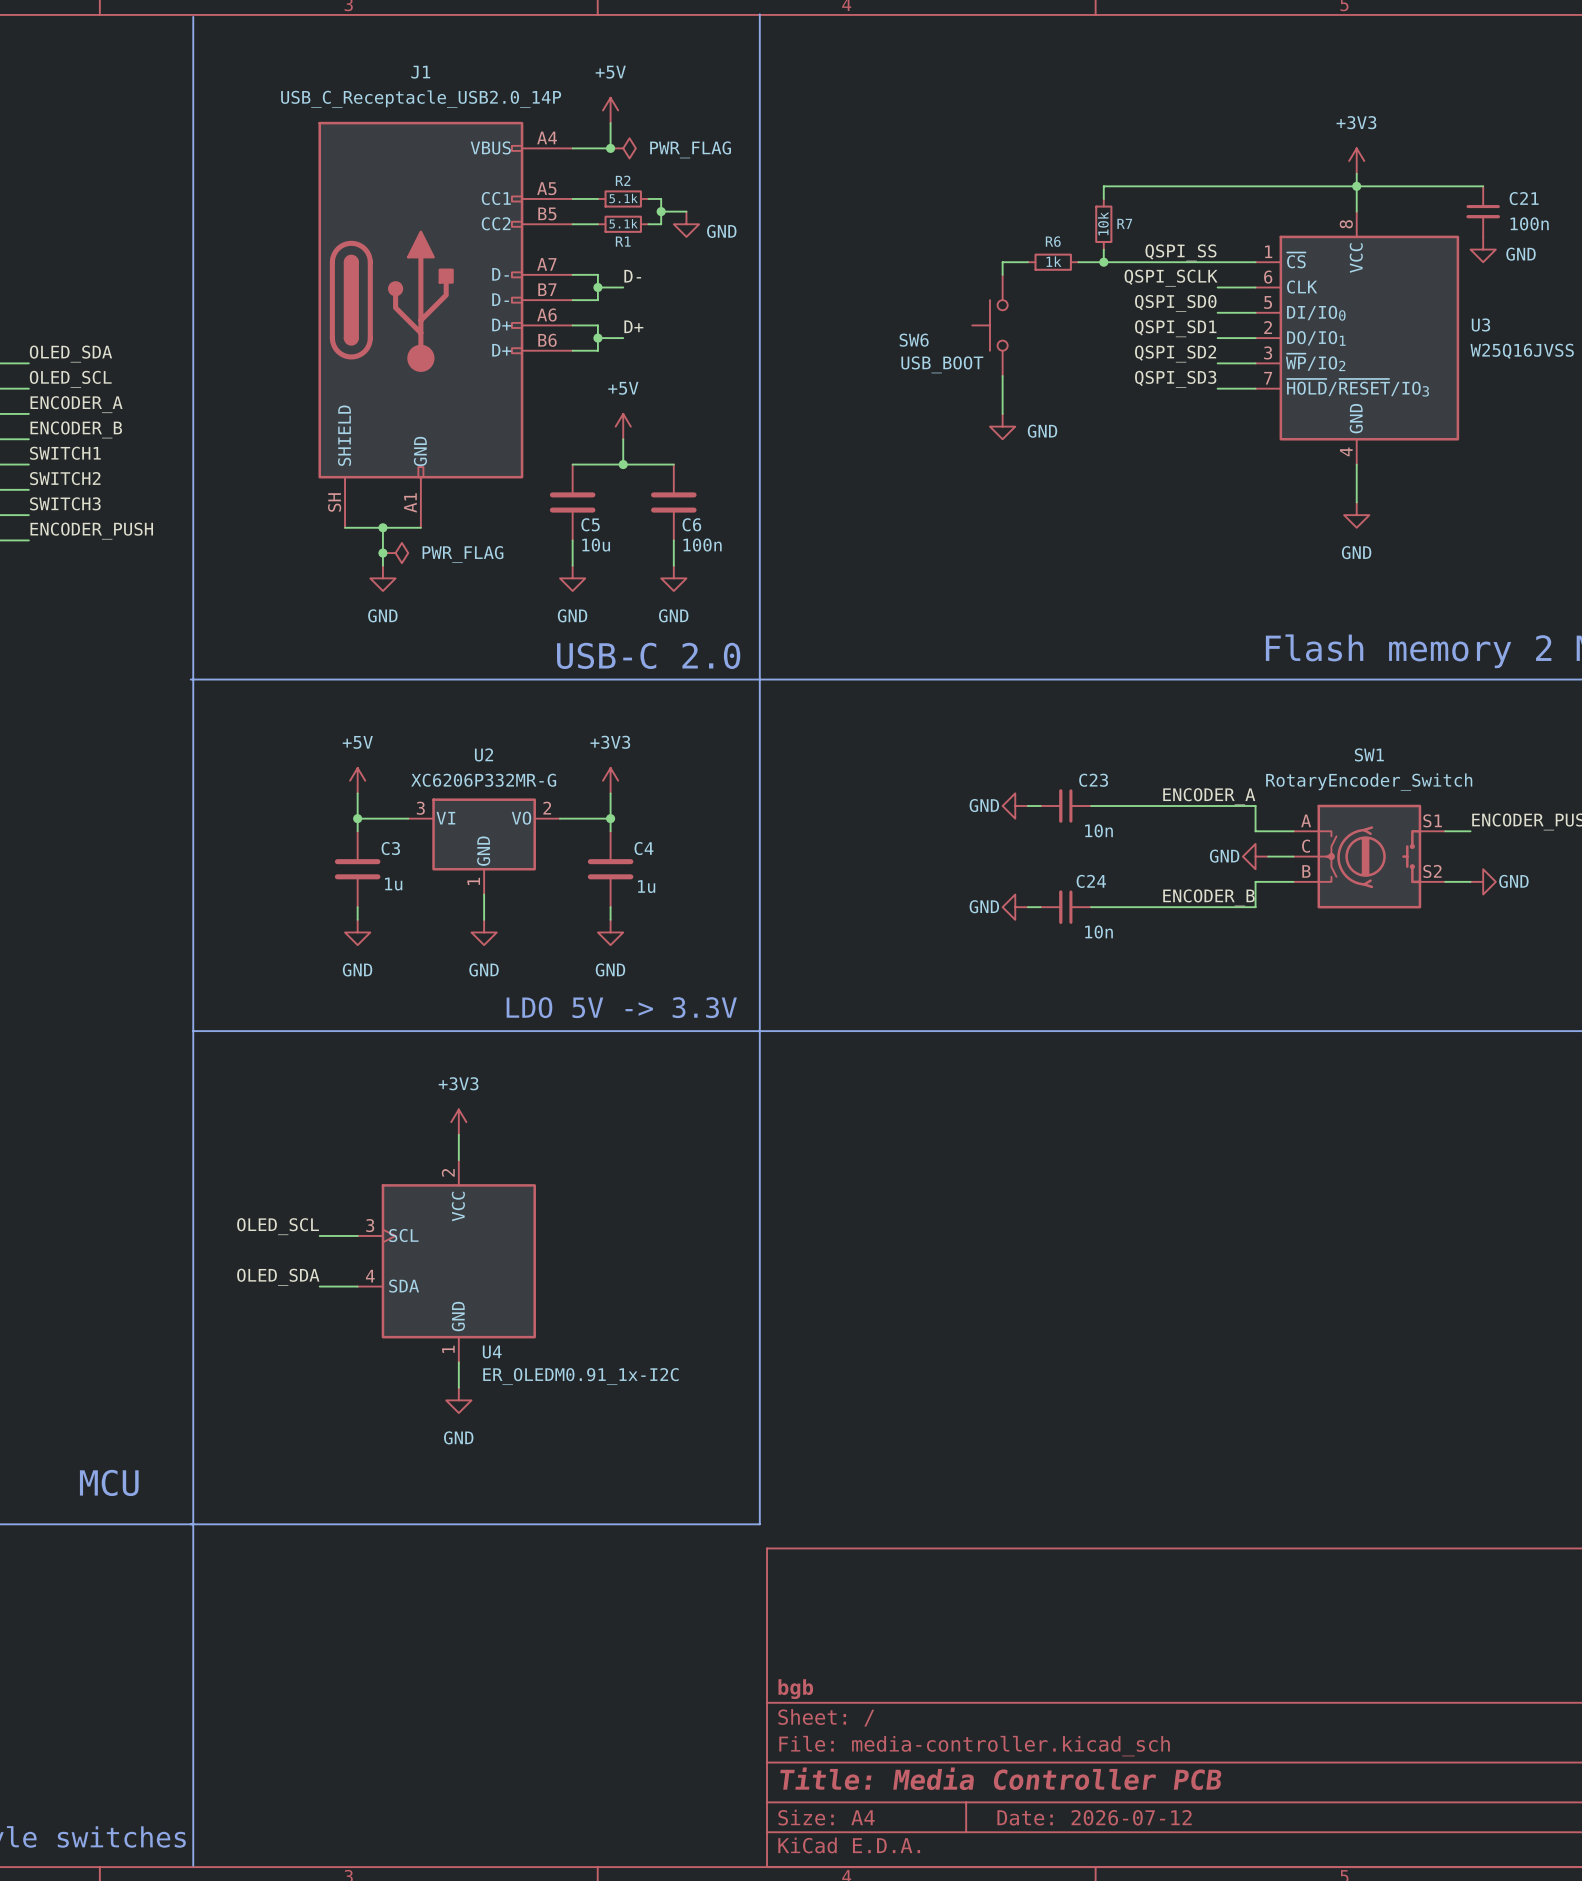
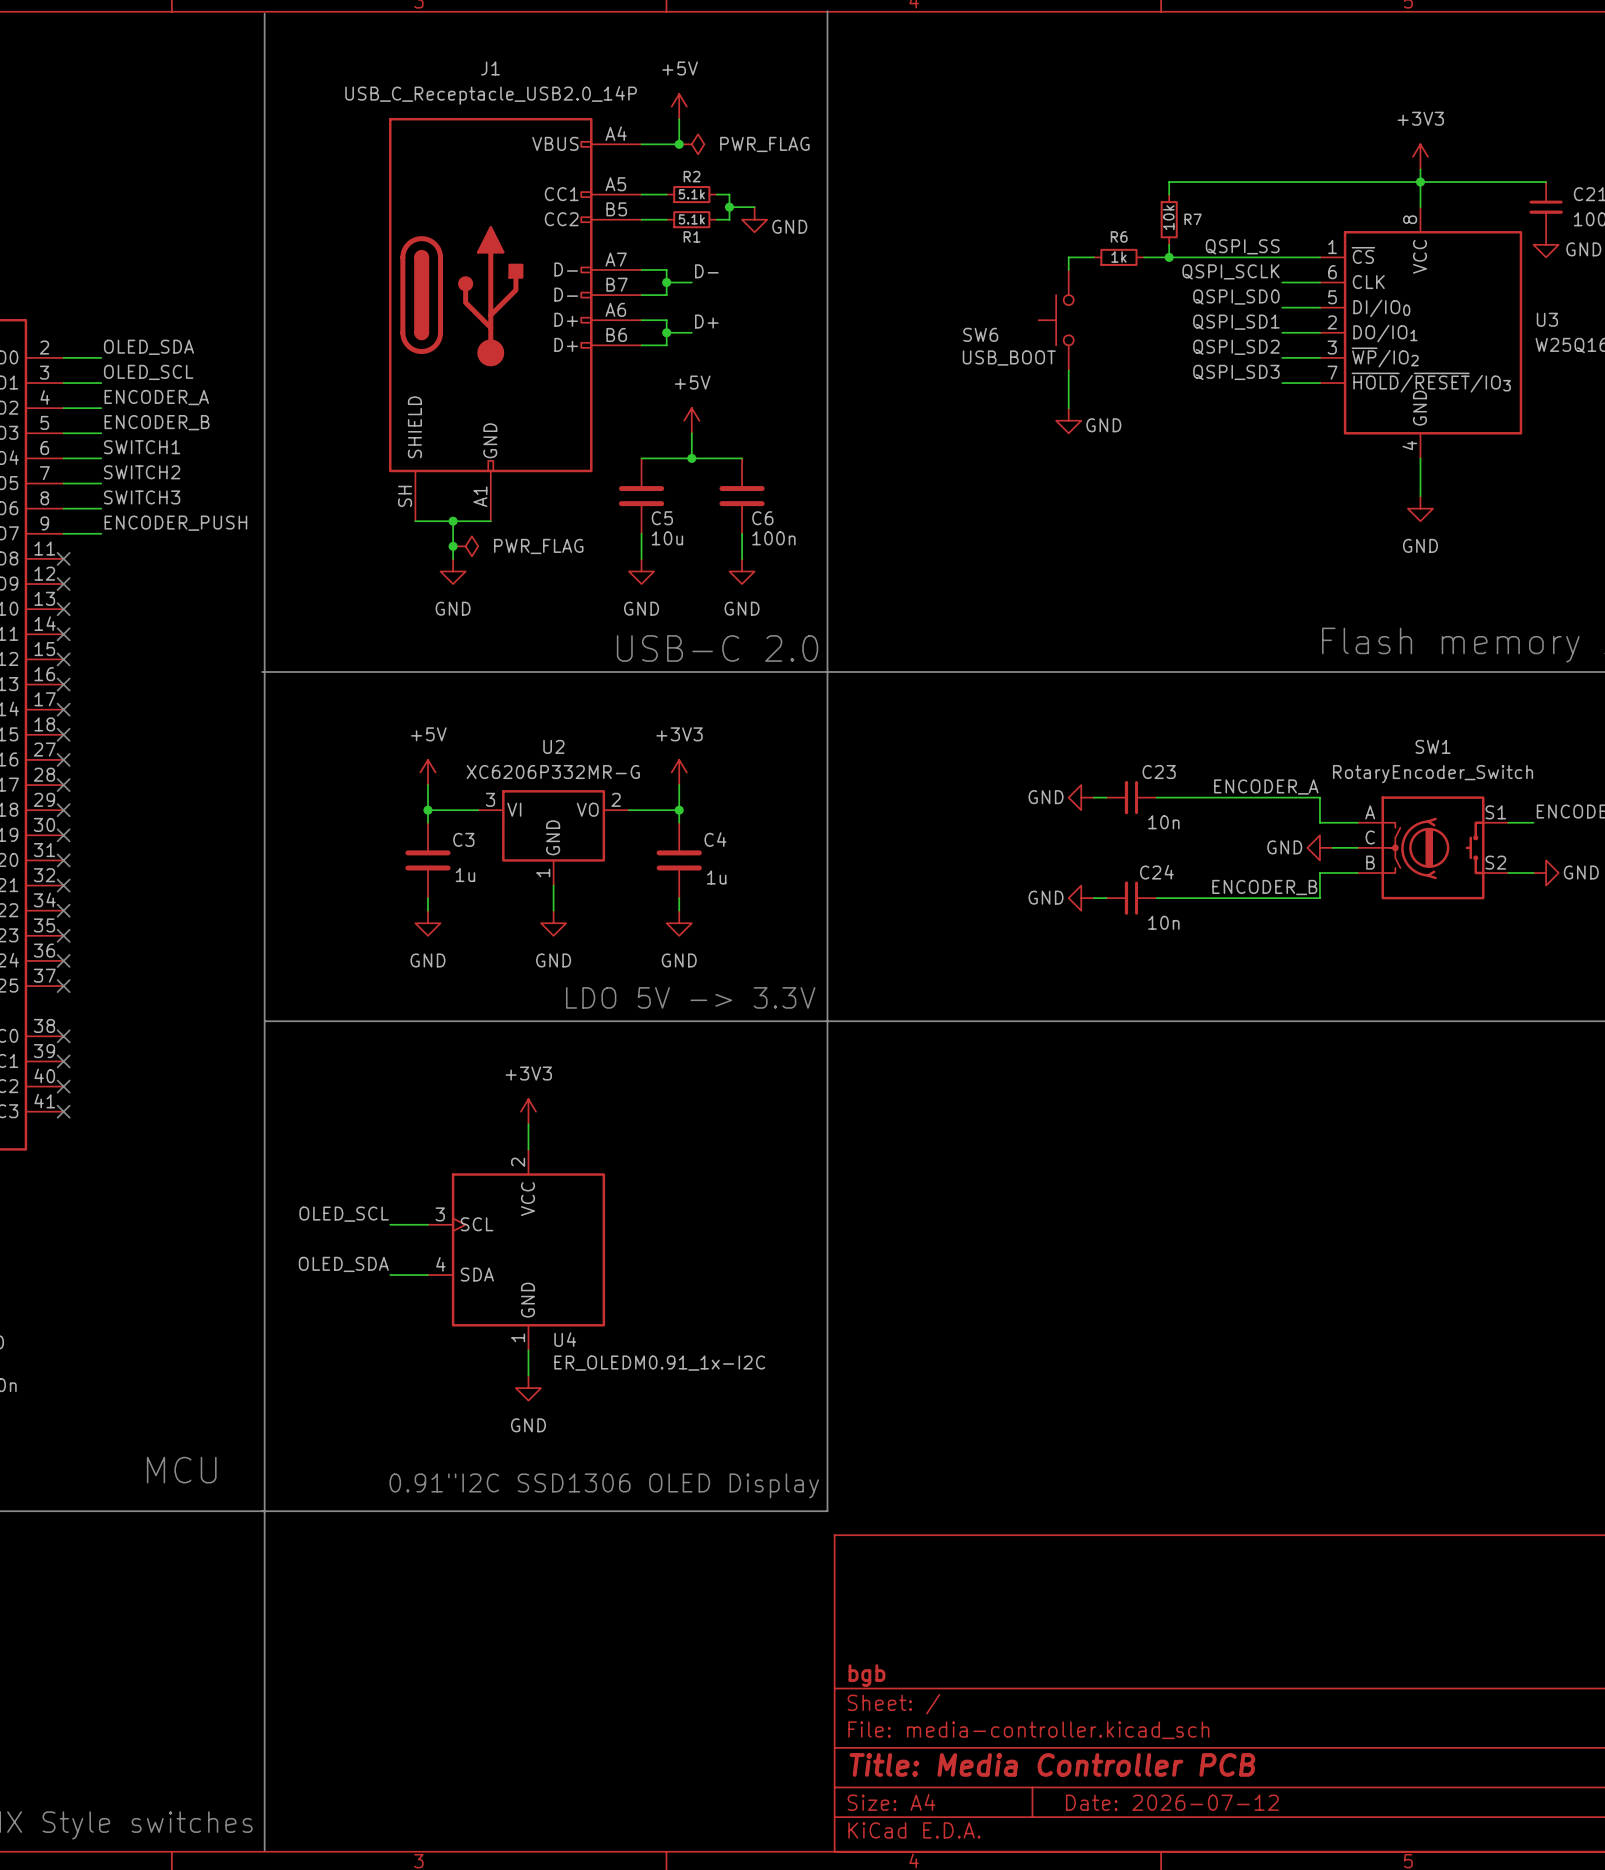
text: none -> 0.91"I2C SSD1306 OLED Display (604, 1485)

